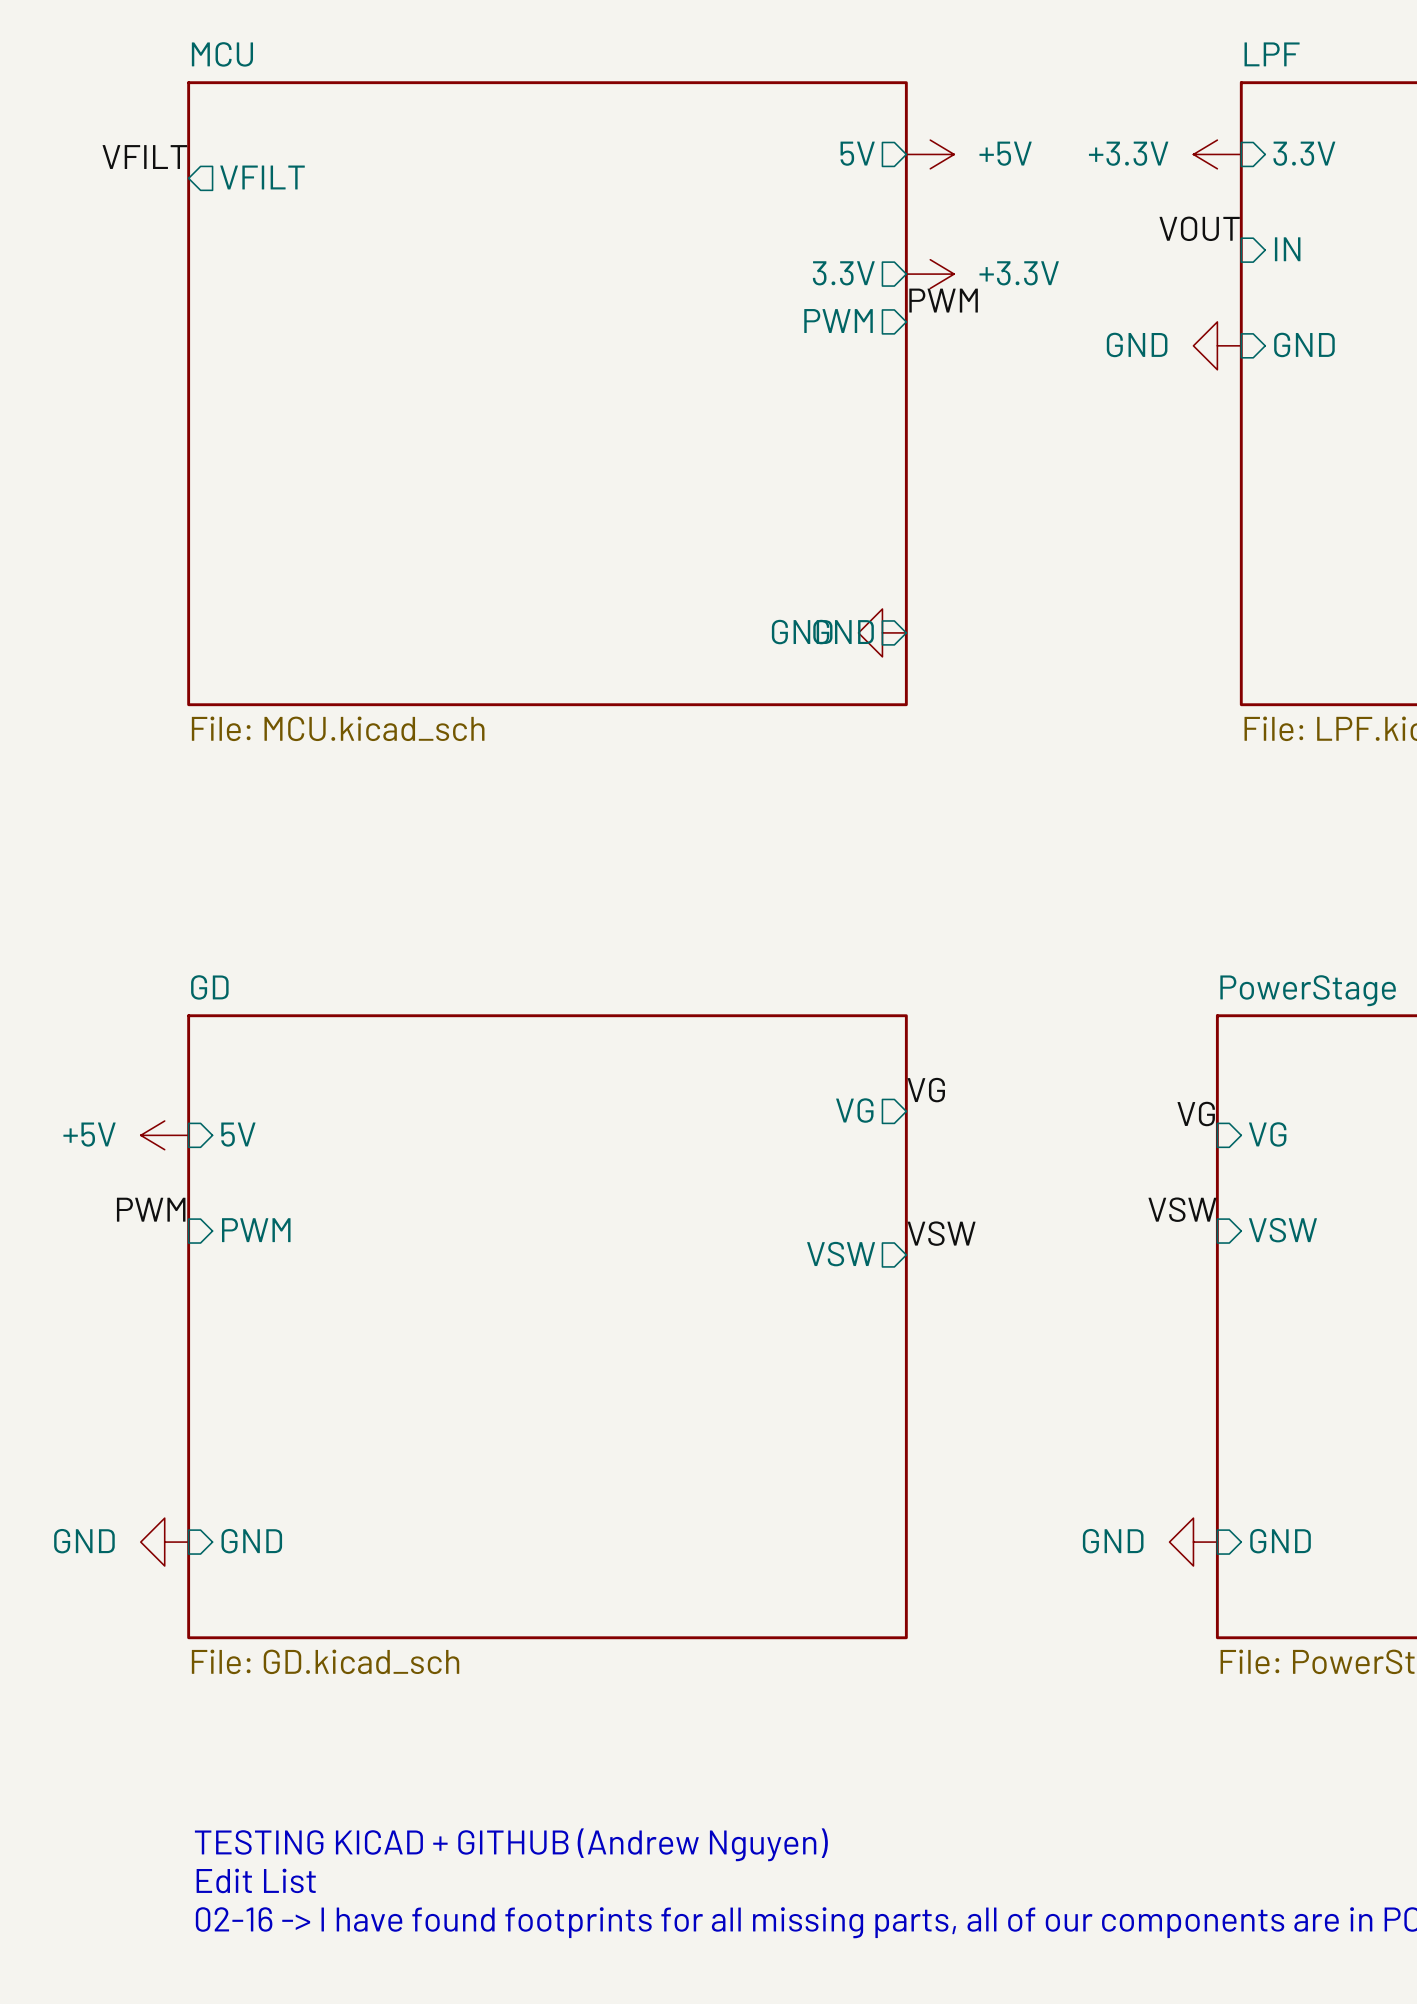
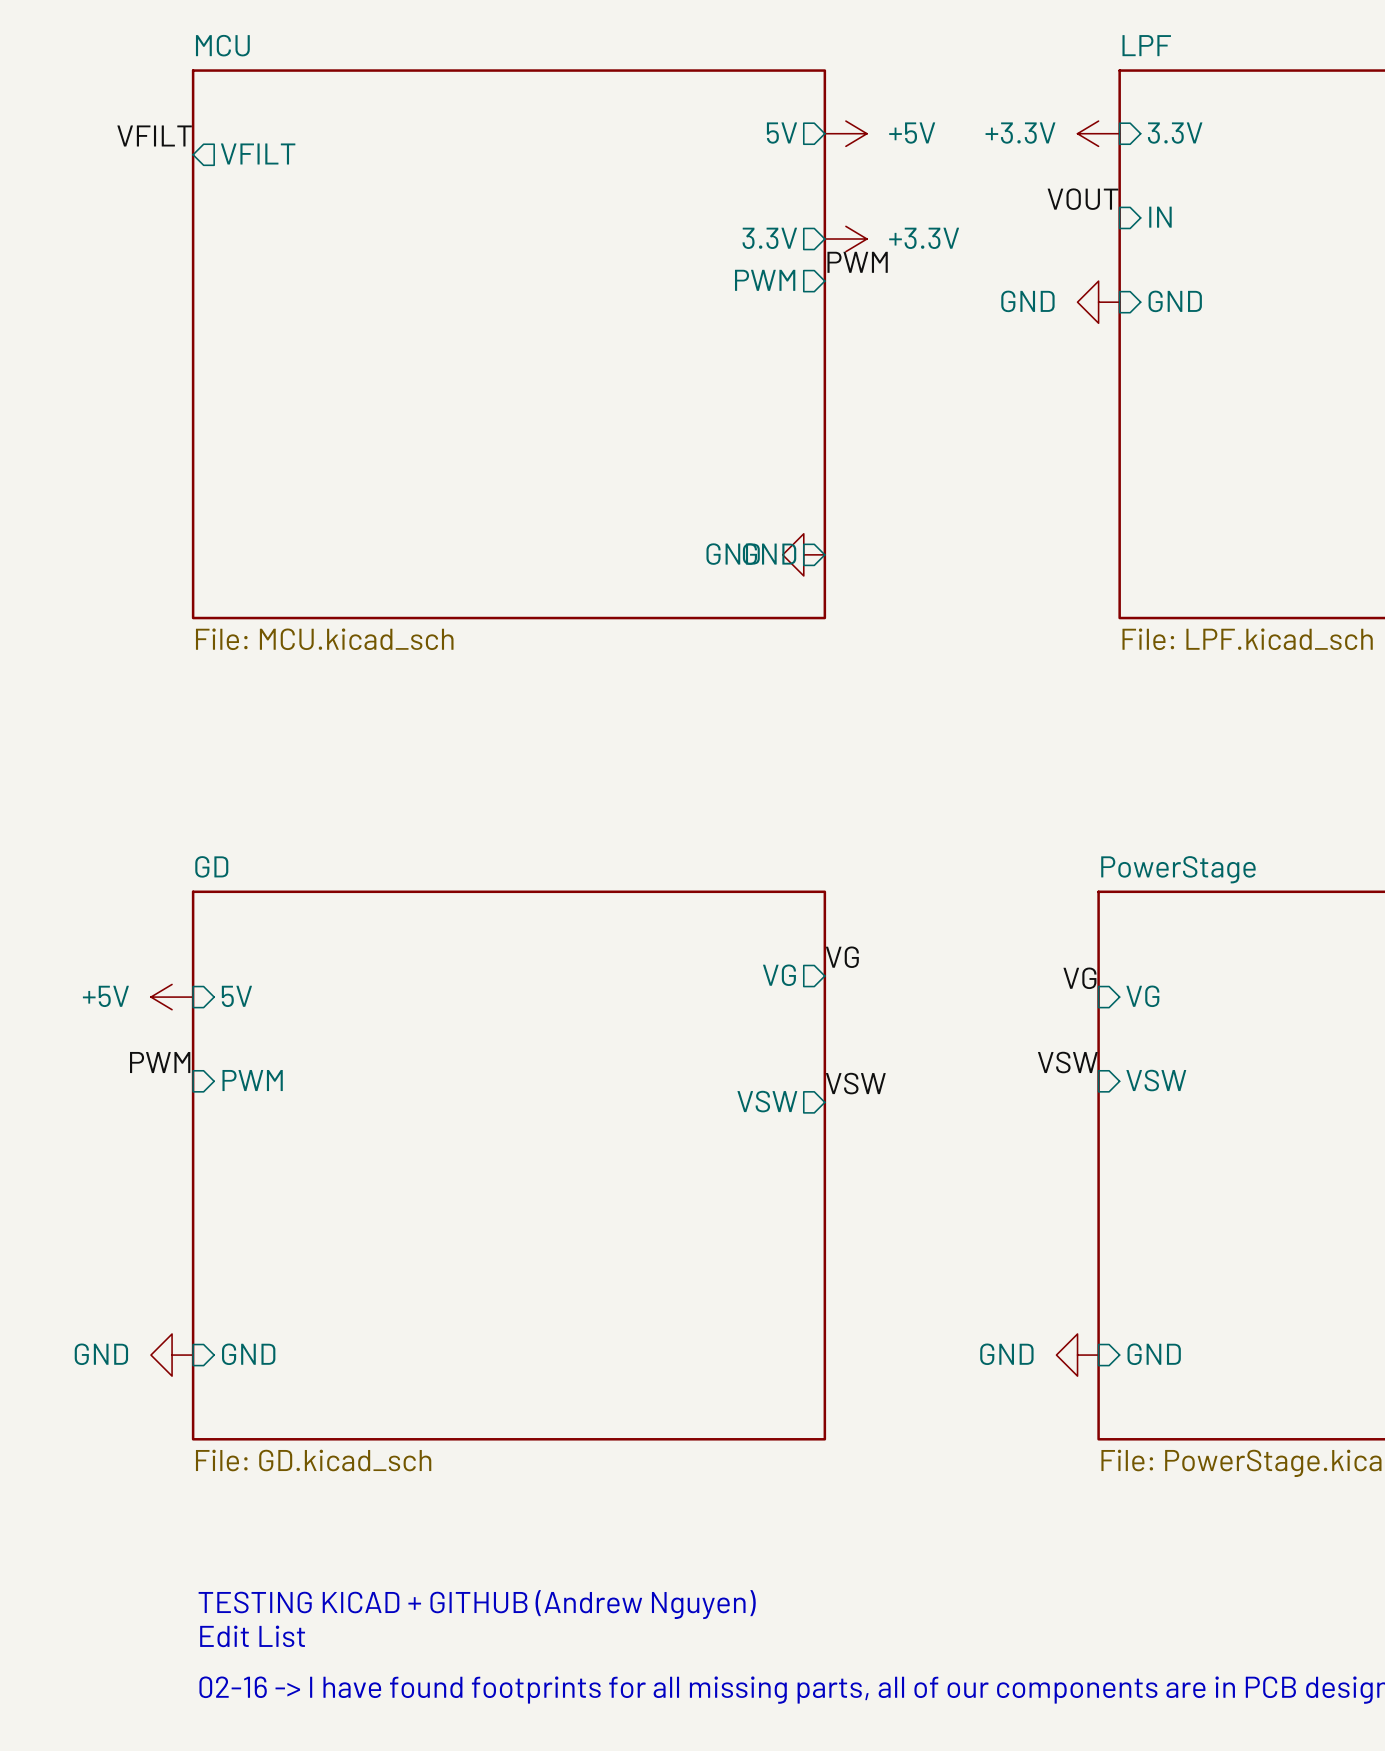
text position: TESTING KICAD + GITHUB (Andrew Nguyen) (511, 1844) -> TESTING KICAD + GITHUB (Andrew Nguyen) (477, 1604)
text position: Edit List (256, 1880) -> Edit List (252, 1636)

